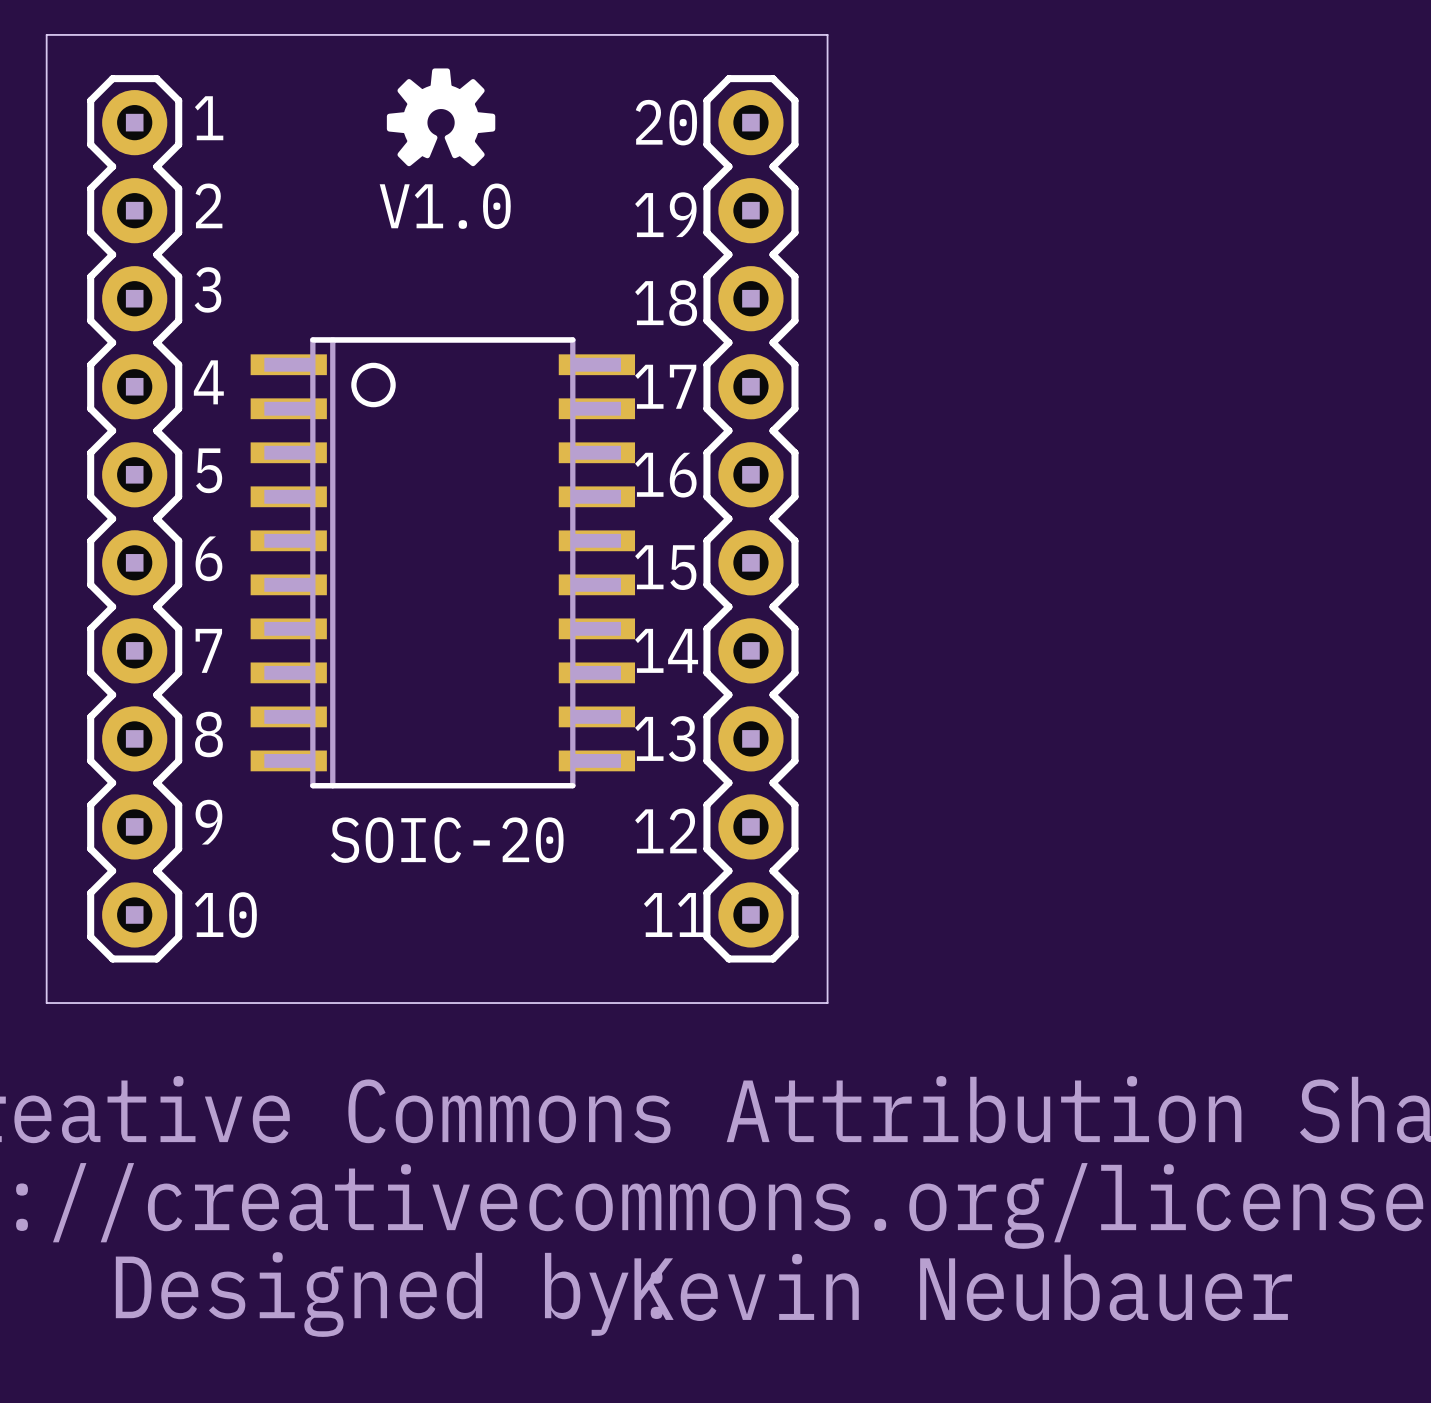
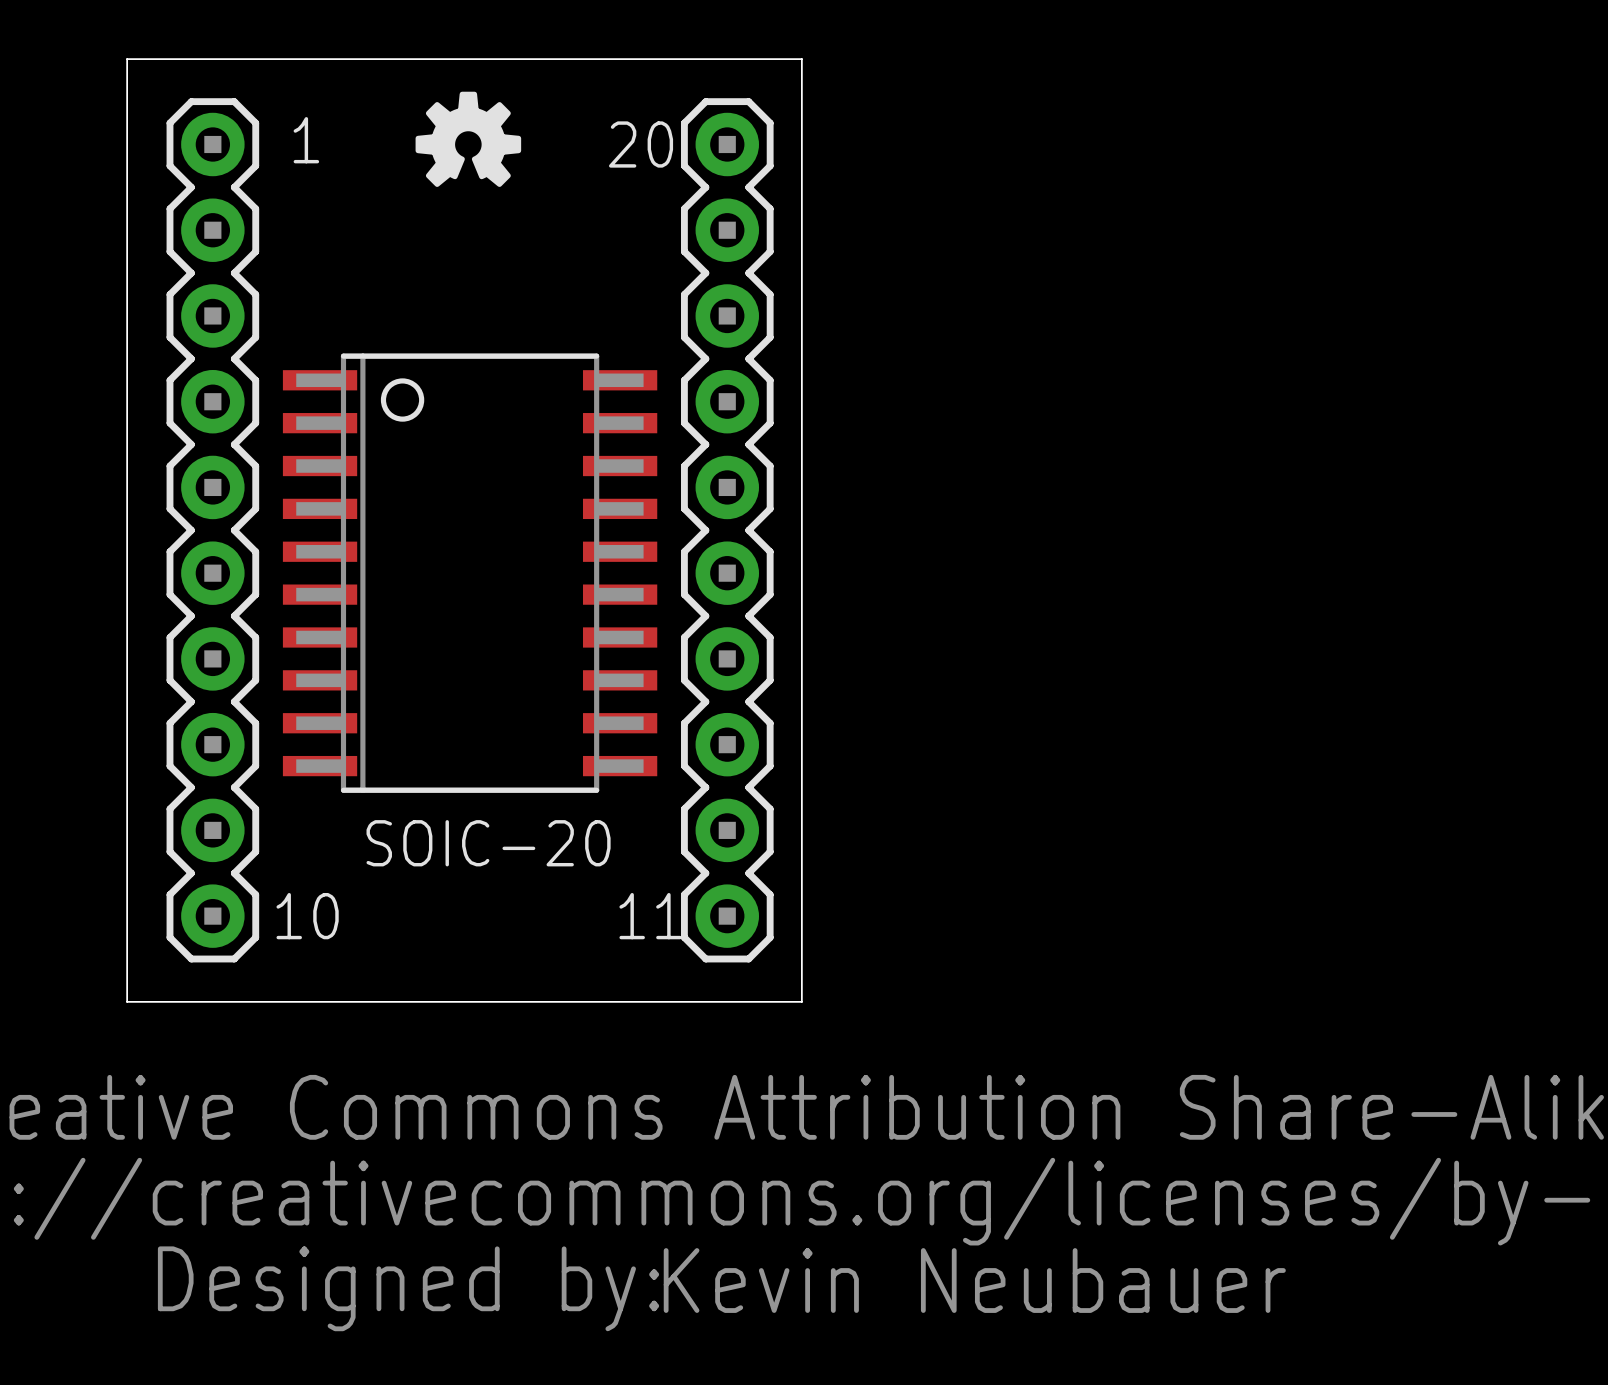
board edge: (90, 34) (46, 34) (46, 1003) (90, 1003) -> (127, 59) (127, 1001)
board edge: (783, 34) (827, 34) (827, 1003) (783, 1003) -> (801, 59) (801, 1001)
text position: 1 (209, 118) -> 1 (306, 140)
text position: 20 (666, 122) -> 20 (641, 144)
text: 2 (209, 205) -> none
text: V1.0 (445, 206) -> none
text: 19 (665, 214) -> none
text: 3 (207, 289) -> none
text: 18 (666, 303) -> none
text: 4 (208, 382) -> none
text: 17 (665, 386) -> none
text: 5 (209, 470) -> none
text: 16 (665, 475) -> none
part position: (134, 518) -> (212, 530)
part position: (750, 518) -> (727, 530)
text: 6 (208, 558) -> none
text: 15 (665, 567) -> none
text: 7 (208, 650) -> none
text: 14 (666, 650) -> none
text: 8 (208, 734) -> none
text: 13 (665, 738) -> none
text: 9 (208, 822) -> none
text: 12 (665, 830) -> none
text position: 10 (225, 914) -> 10 (307, 916)
text position: 11 (675, 914) -> 11 (650, 916)

